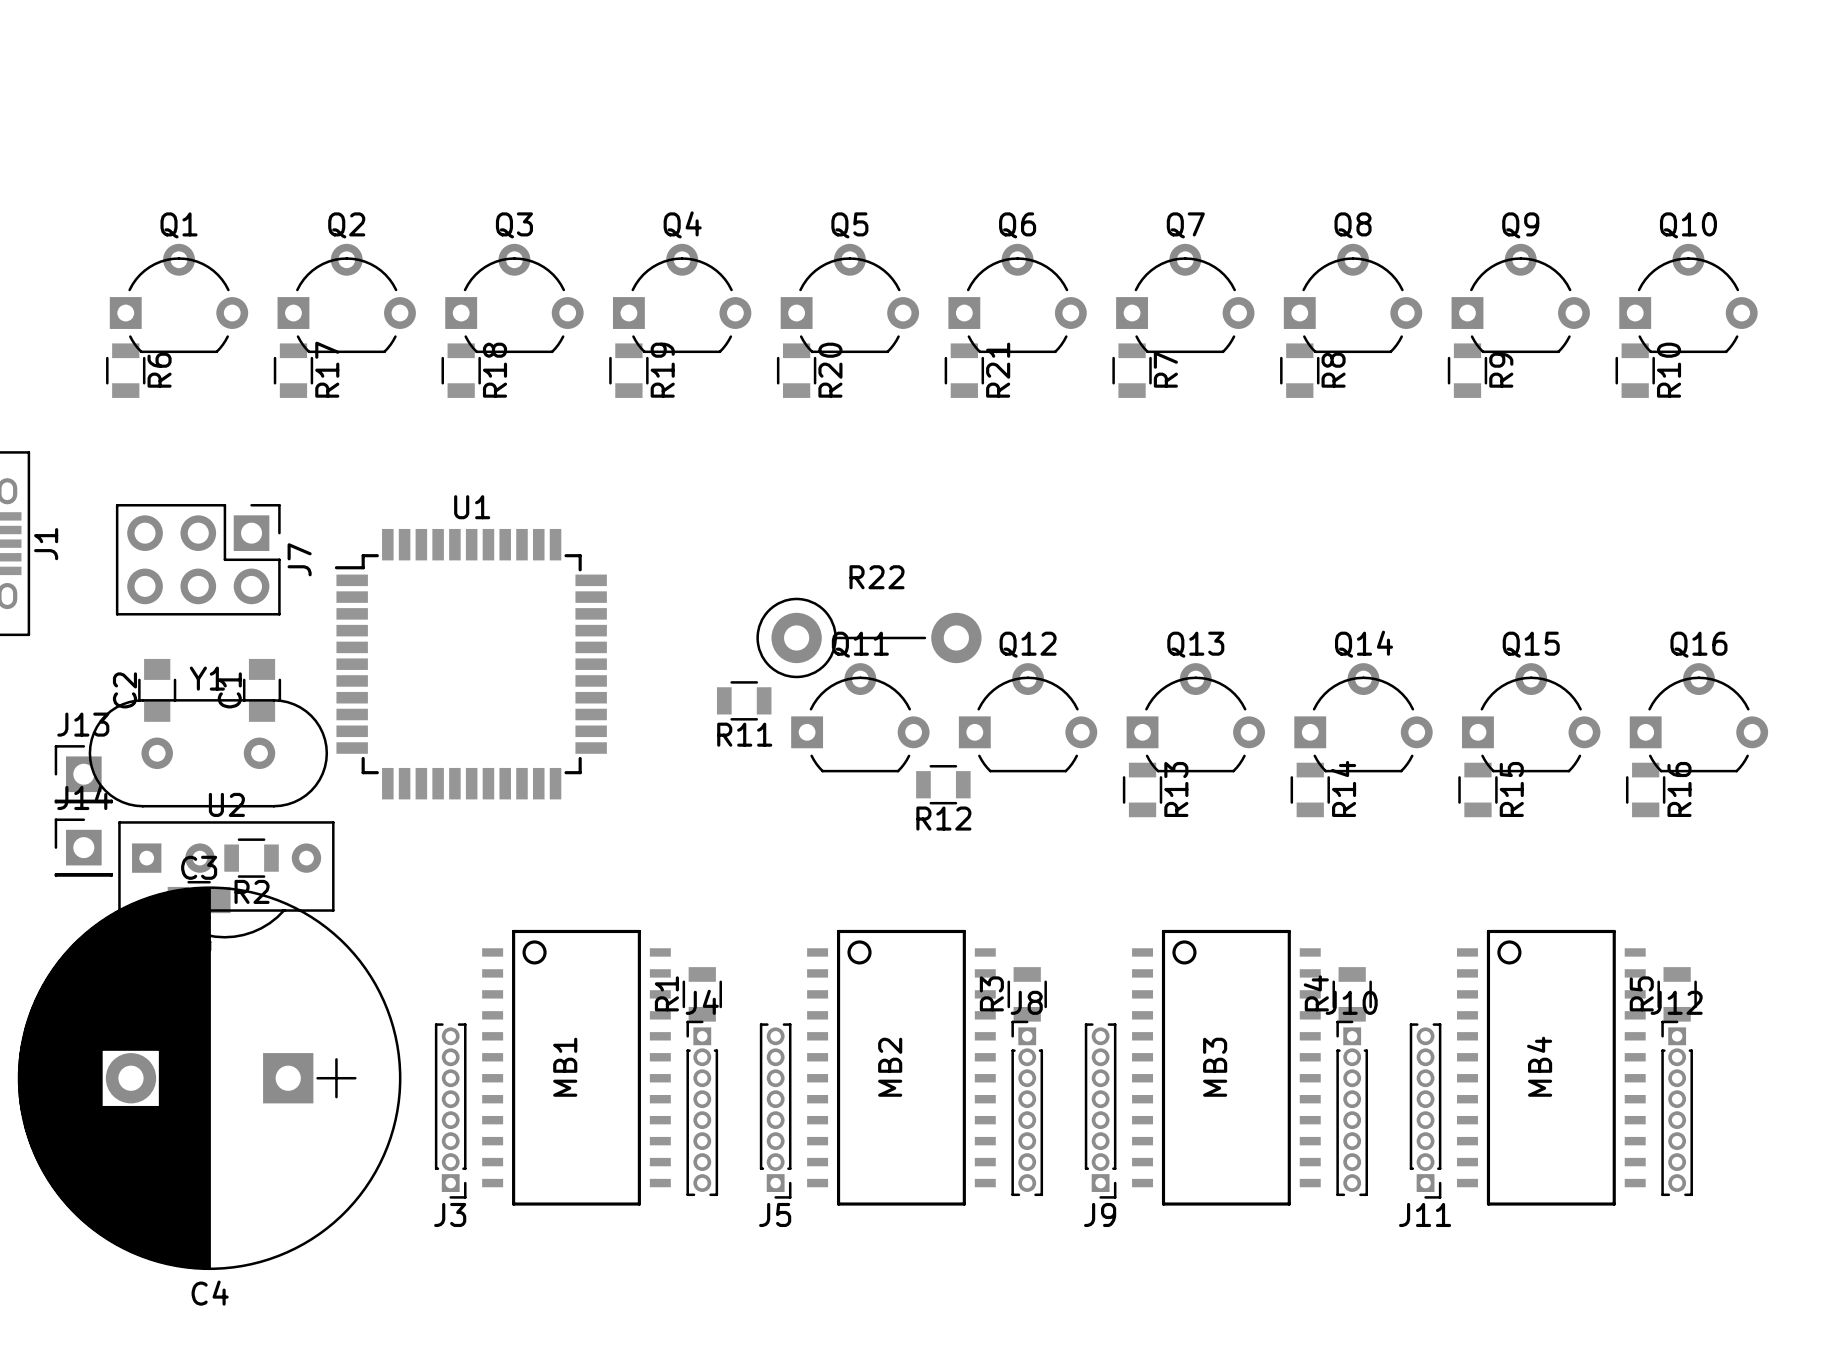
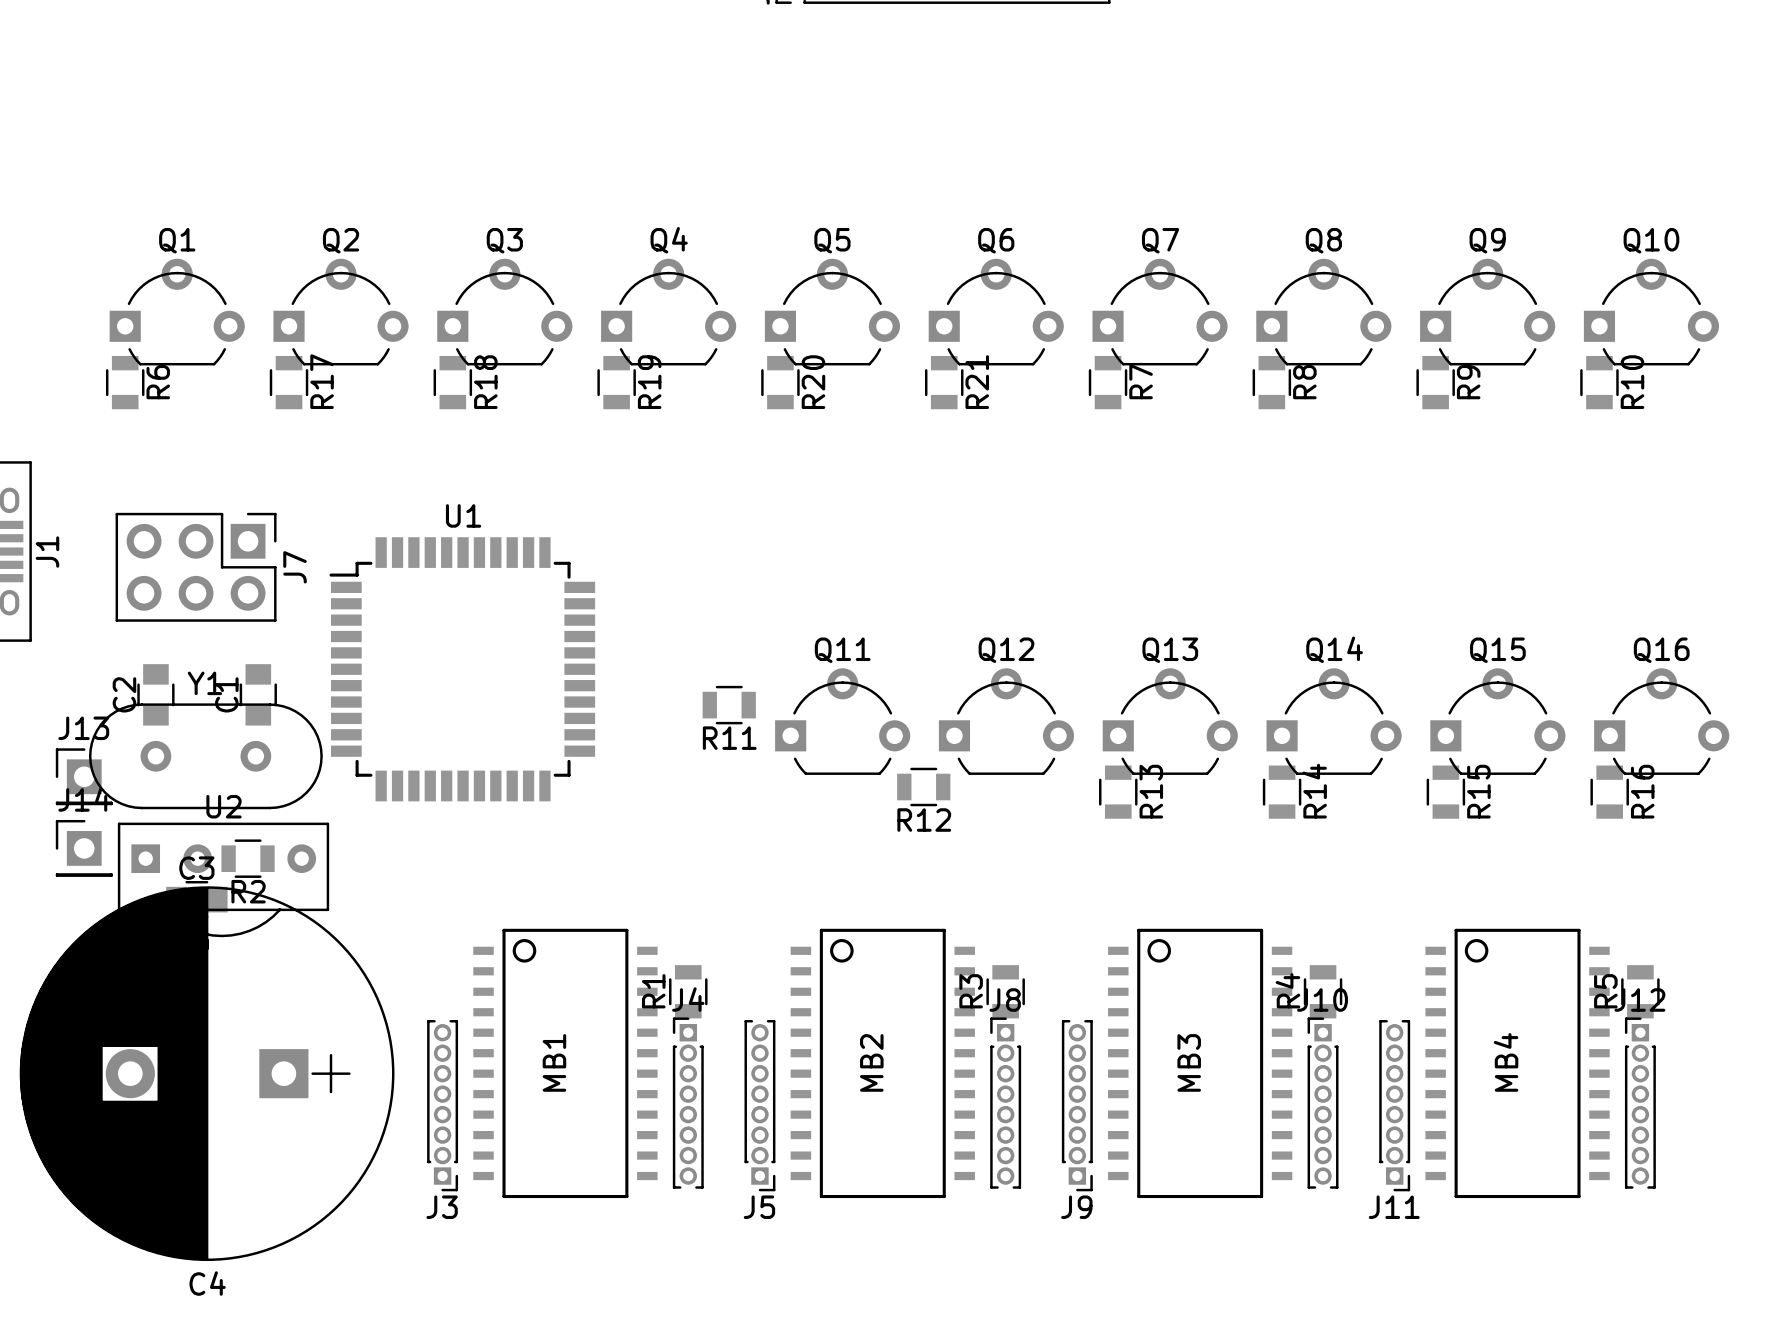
R22: (868, 637) -> none

